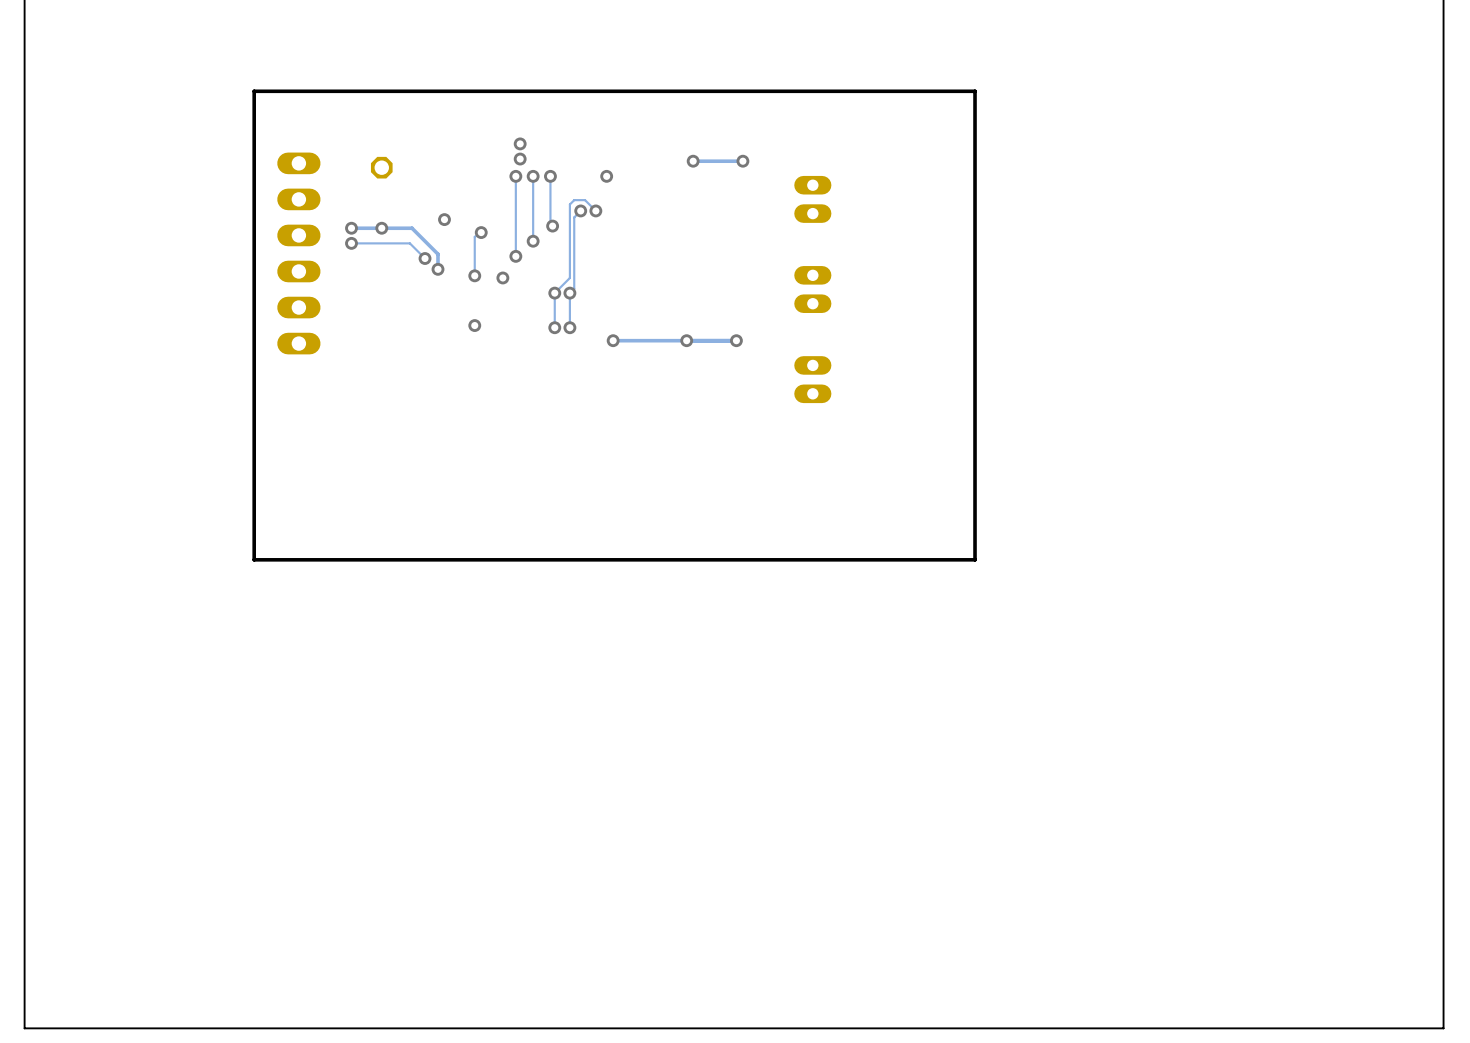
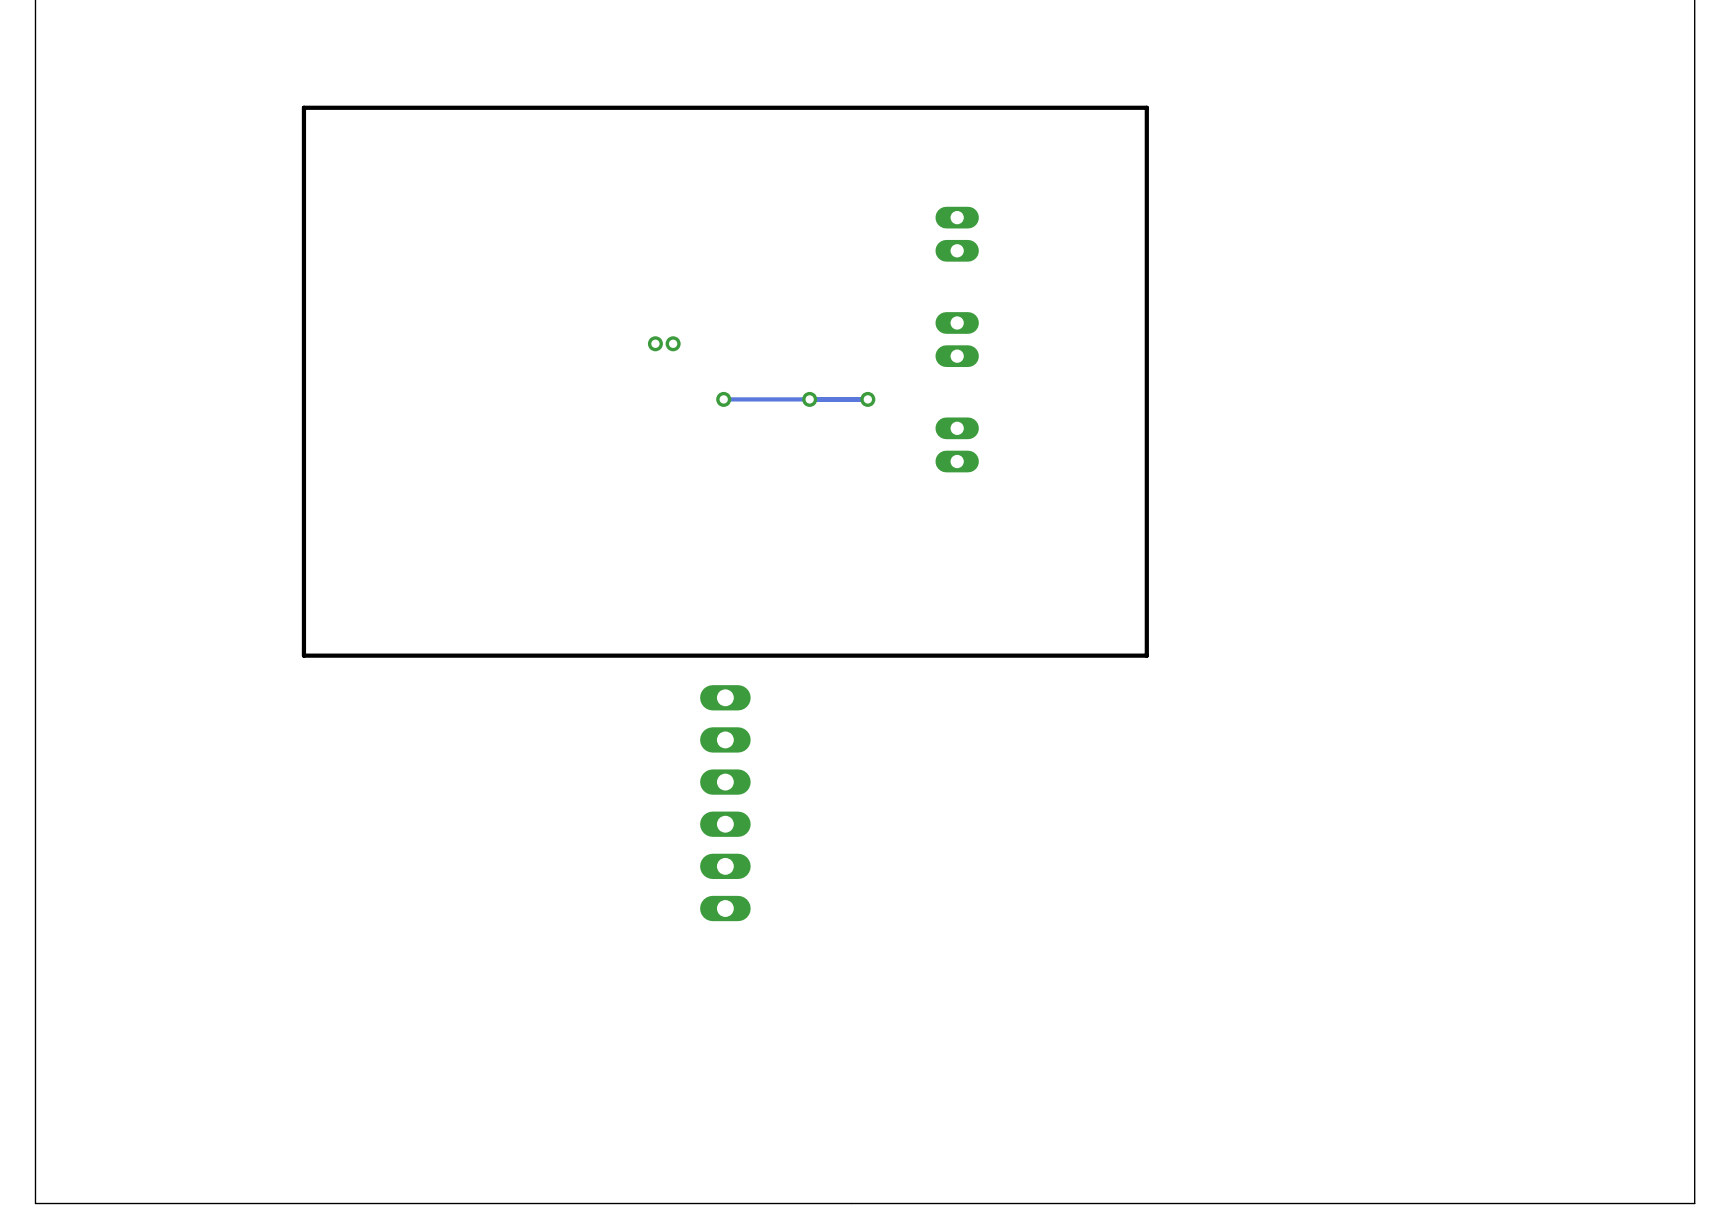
via: (520, 143) -> none
via: (520, 159) -> none
via: (693, 161) -> none
track: (742, 161) (693, 161) -> none
via: (742, 161) -> none
part: (381, 167) -> none
track: (515, 176) (515, 256) -> none
via: (515, 176) -> none
track: (533, 176) (533, 241) -> none
via: (533, 176) -> none
track: (550, 176) (550, 223) (552, 226) -> none
via: (550, 176) -> none
via: (606, 176) -> none
track: (580, 210) (574, 217) (574, 288) (569, 293) (569, 327) -> none
via: (580, 210) -> none
track: (595, 210) (585, 200) (574, 200) (569, 204) (569, 277) (554, 293) (554, 327) -> none
via: (595, 210) -> none
via: (444, 219) -> none
via: (552, 226) -> none
track: (351, 228) (412, 228) (438, 254) (438, 269) -> none
via: (351, 228) -> none
via: (381, 228) -> none
track: (481, 232) (474, 236) (474, 275) -> none
via: (481, 232) -> none
via: (533, 241) -> none
track: (351, 243) (409, 243) (425, 258) -> none
via: (351, 243) -> none
part: (298, 253) -> none
via: (515, 256) -> none
via: (425, 258) -> none
via: (438, 269) -> none
via: (474, 275) -> none
via: (502, 277) -> none
via: (474, 325) -> none
via: (554, 327) -> none
via: (569, 327) -> none
part: none -> (725, 803)

